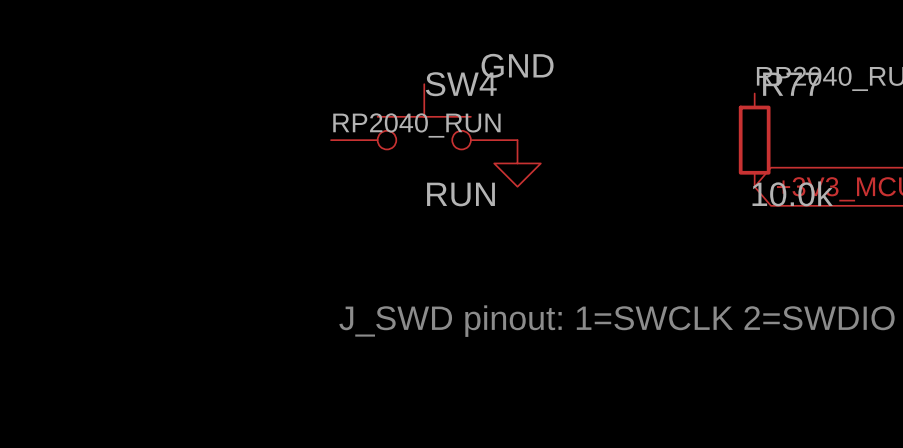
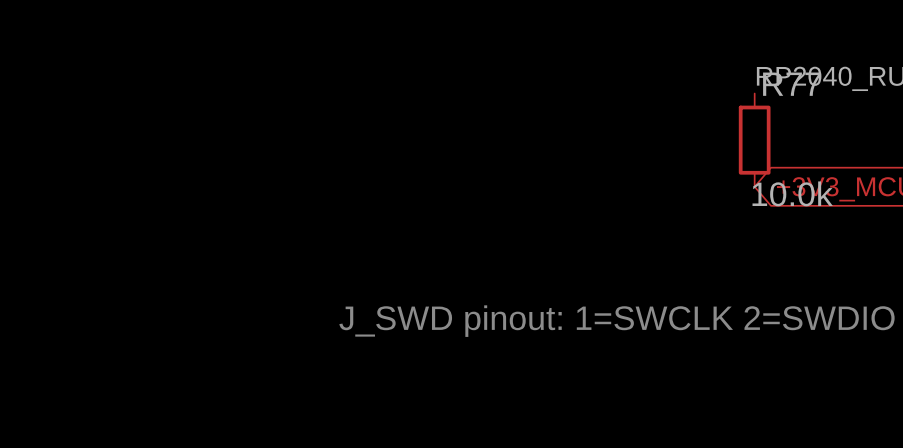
SW4: RUN (424, 116) -> none
label: RP2040_RUN (416, 125) -> none
power symbol: GND (517, 163) -> none

